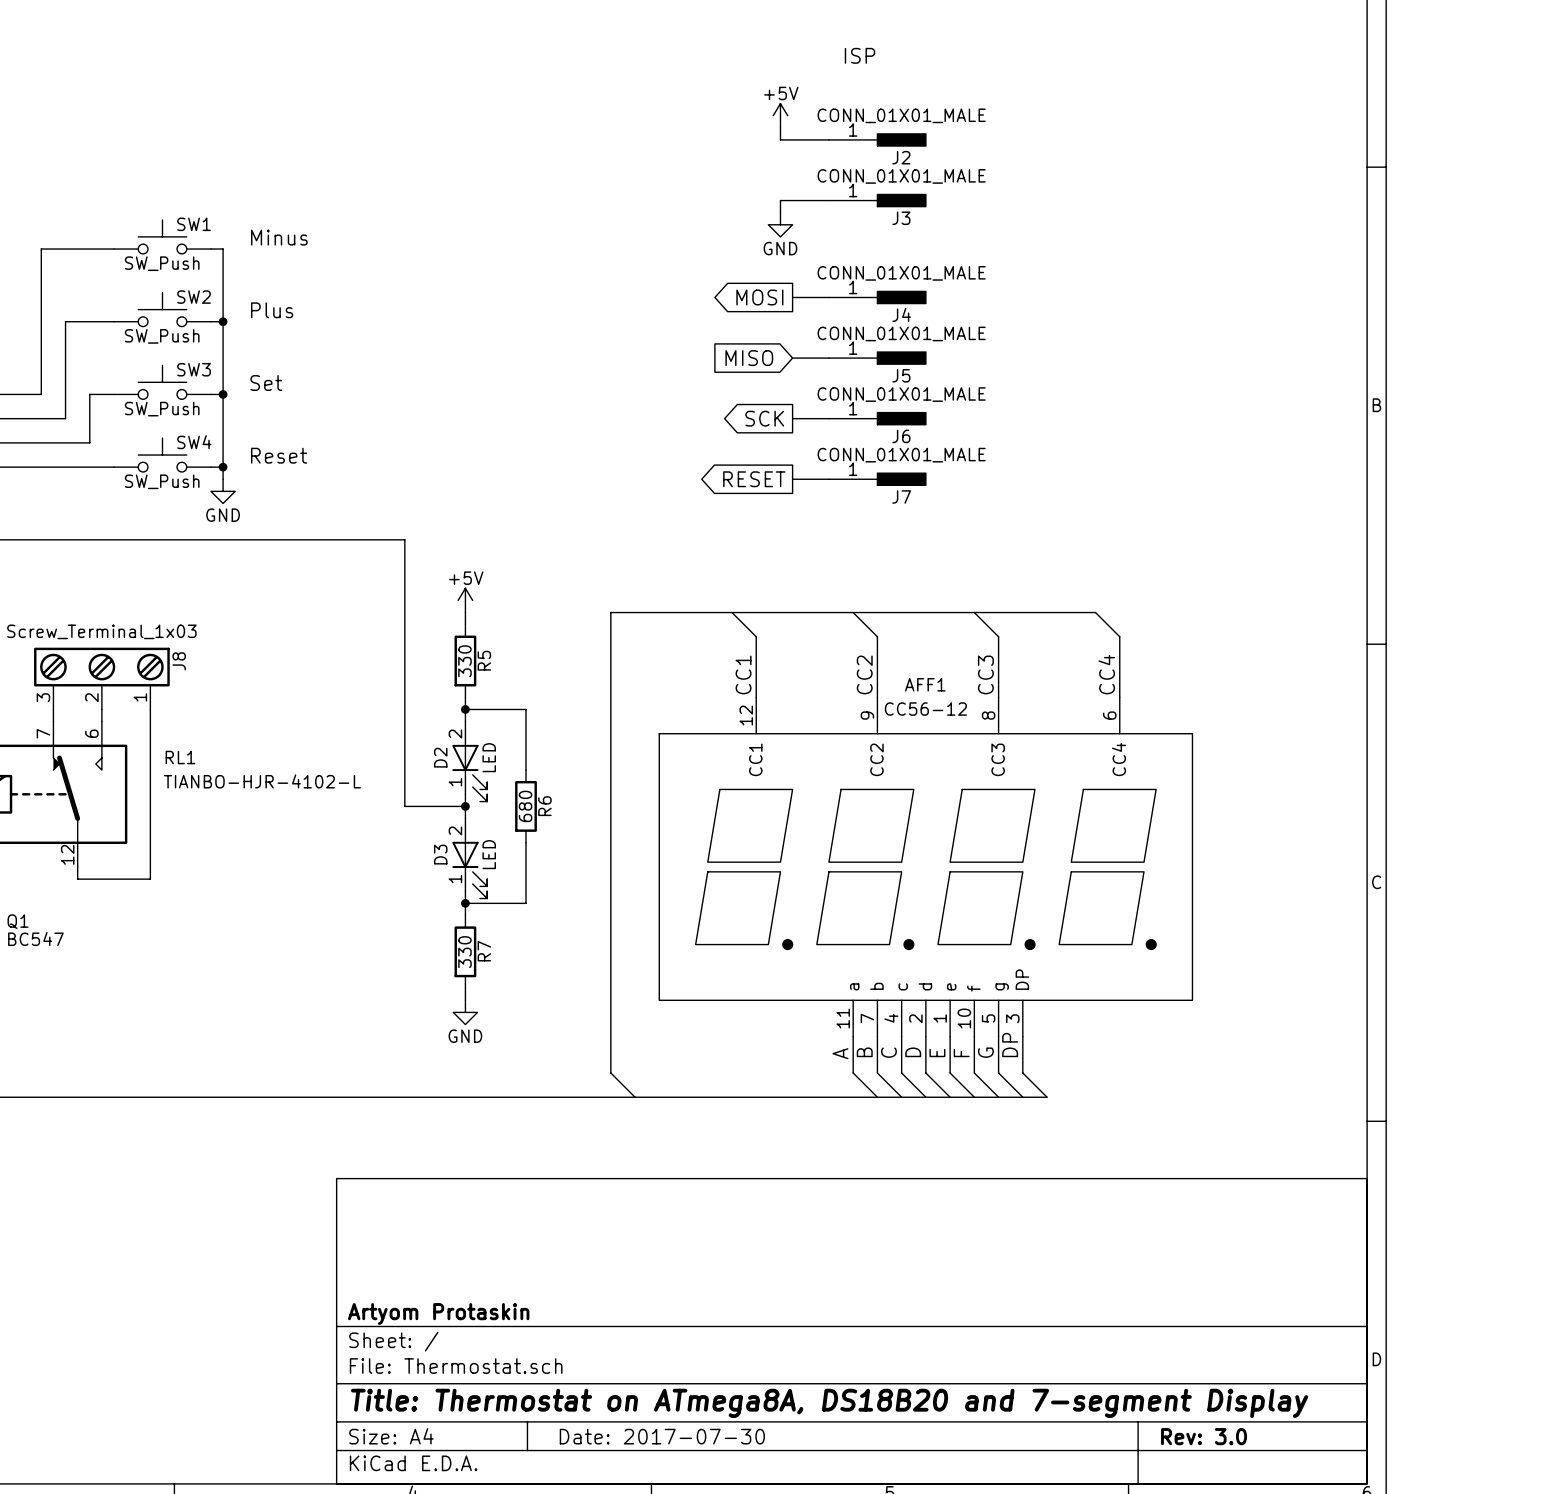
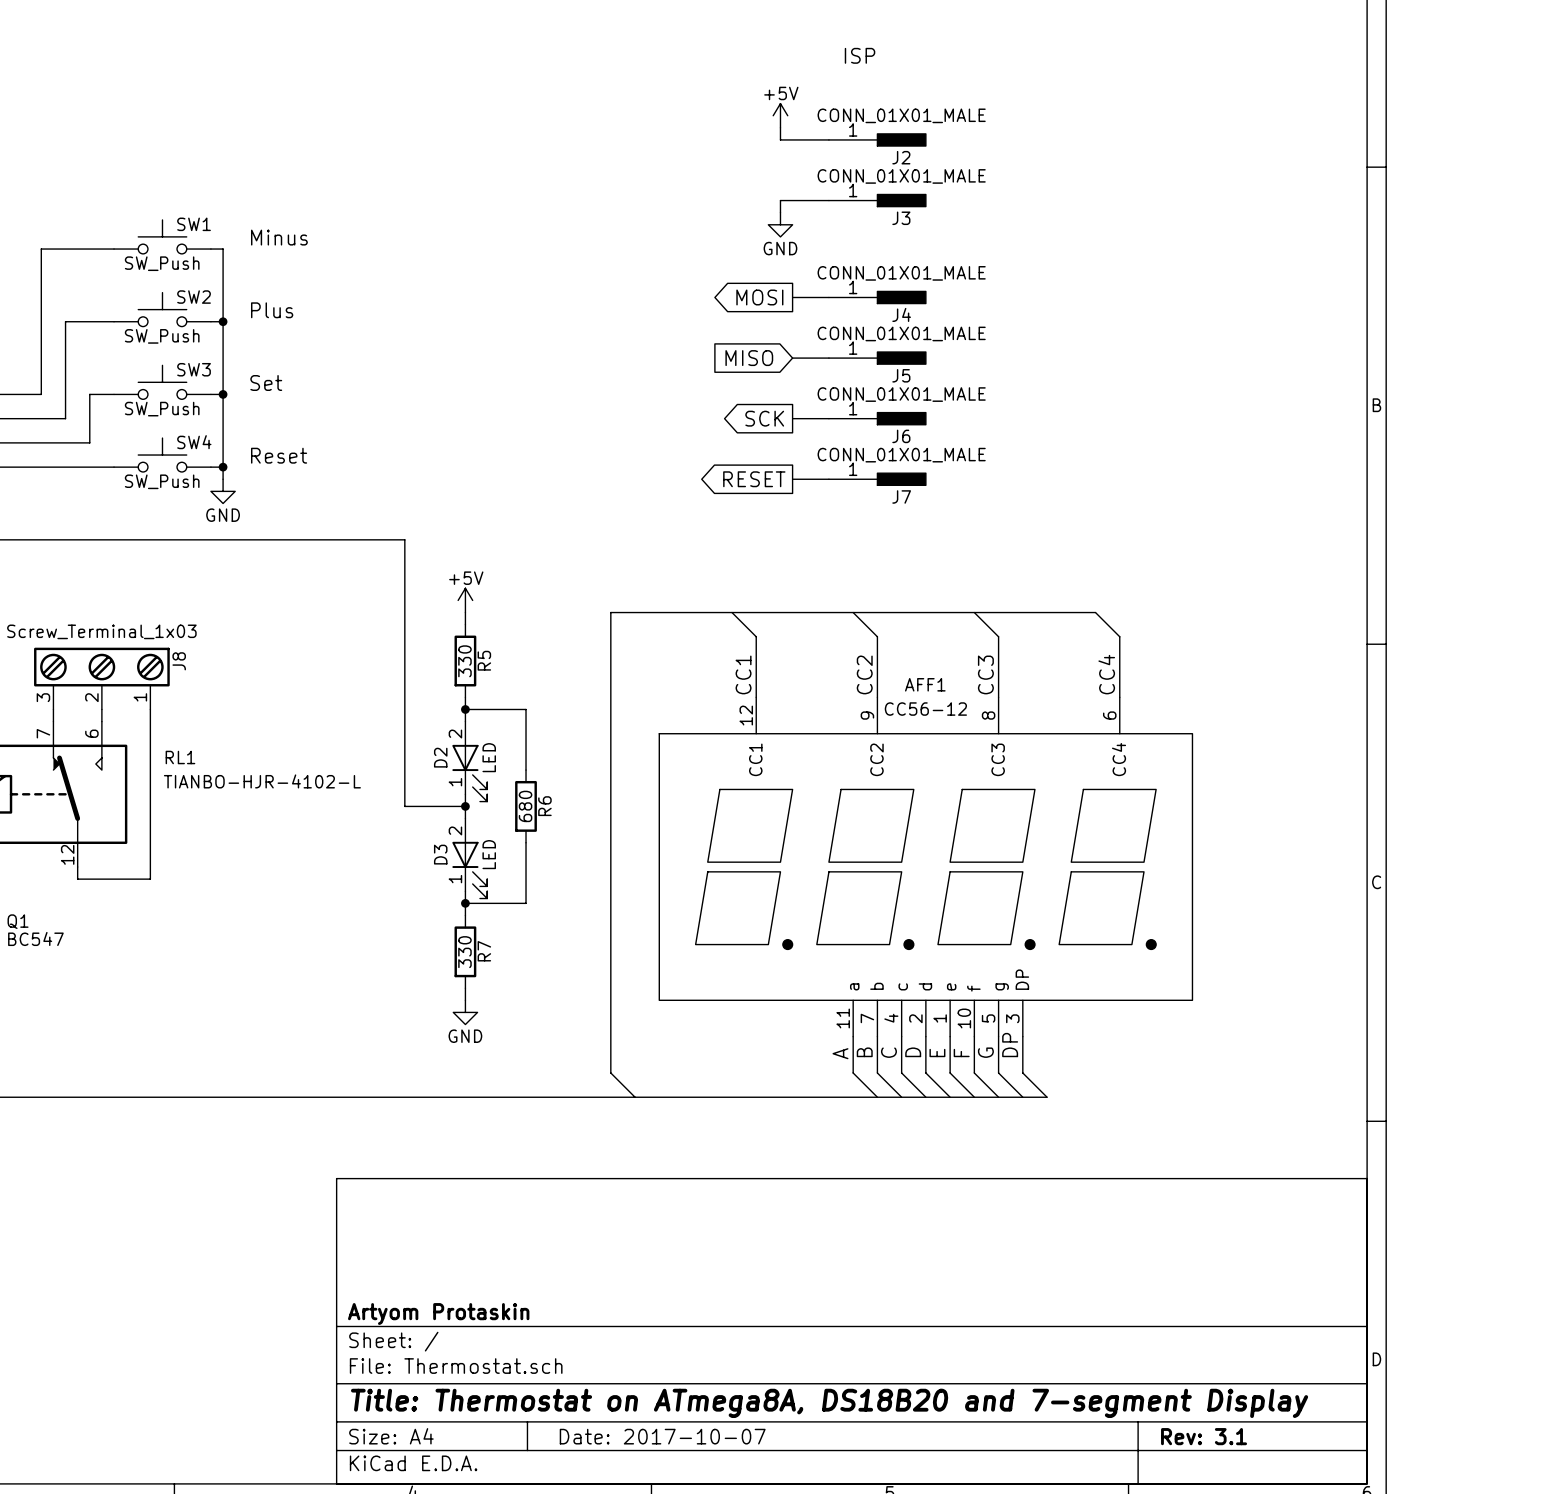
title block: Date: 2017-07-30 (662, 1436) -> Date: 2017-10-07 (662, 1436)
title block: Rev: 3.0 (1204, 1436) -> Rev: 3.1 (1204, 1436)

